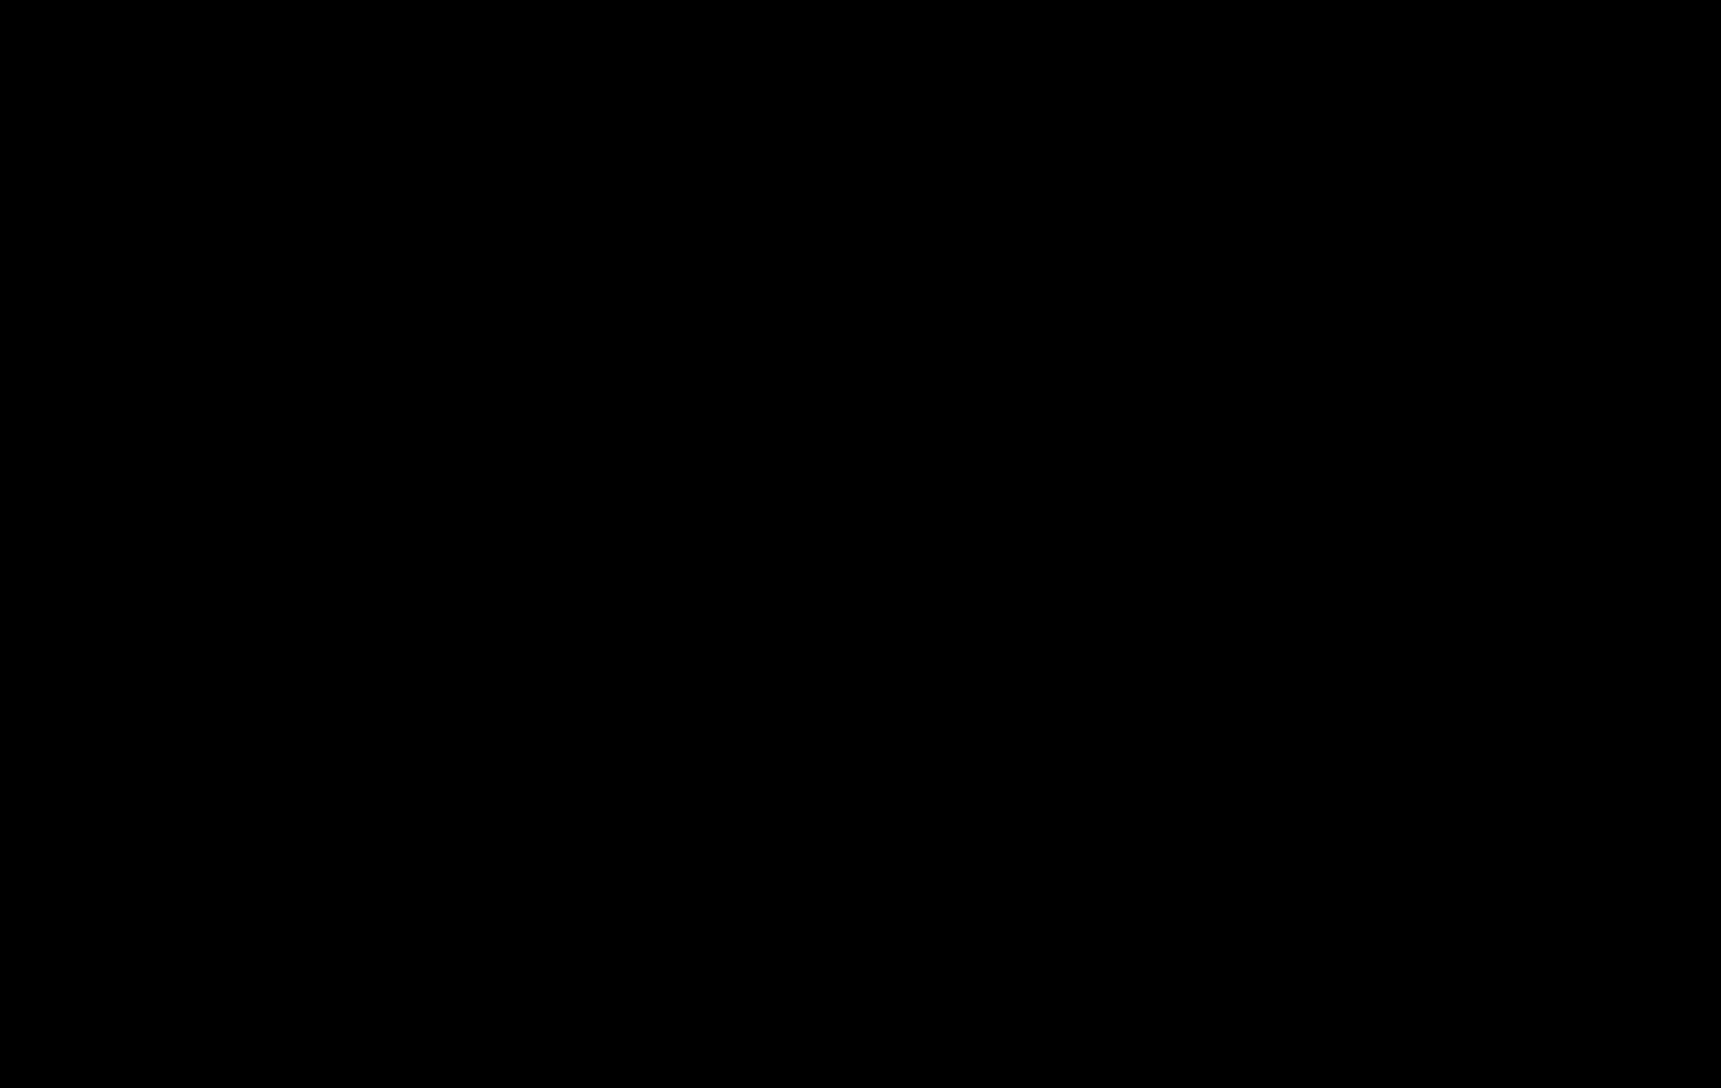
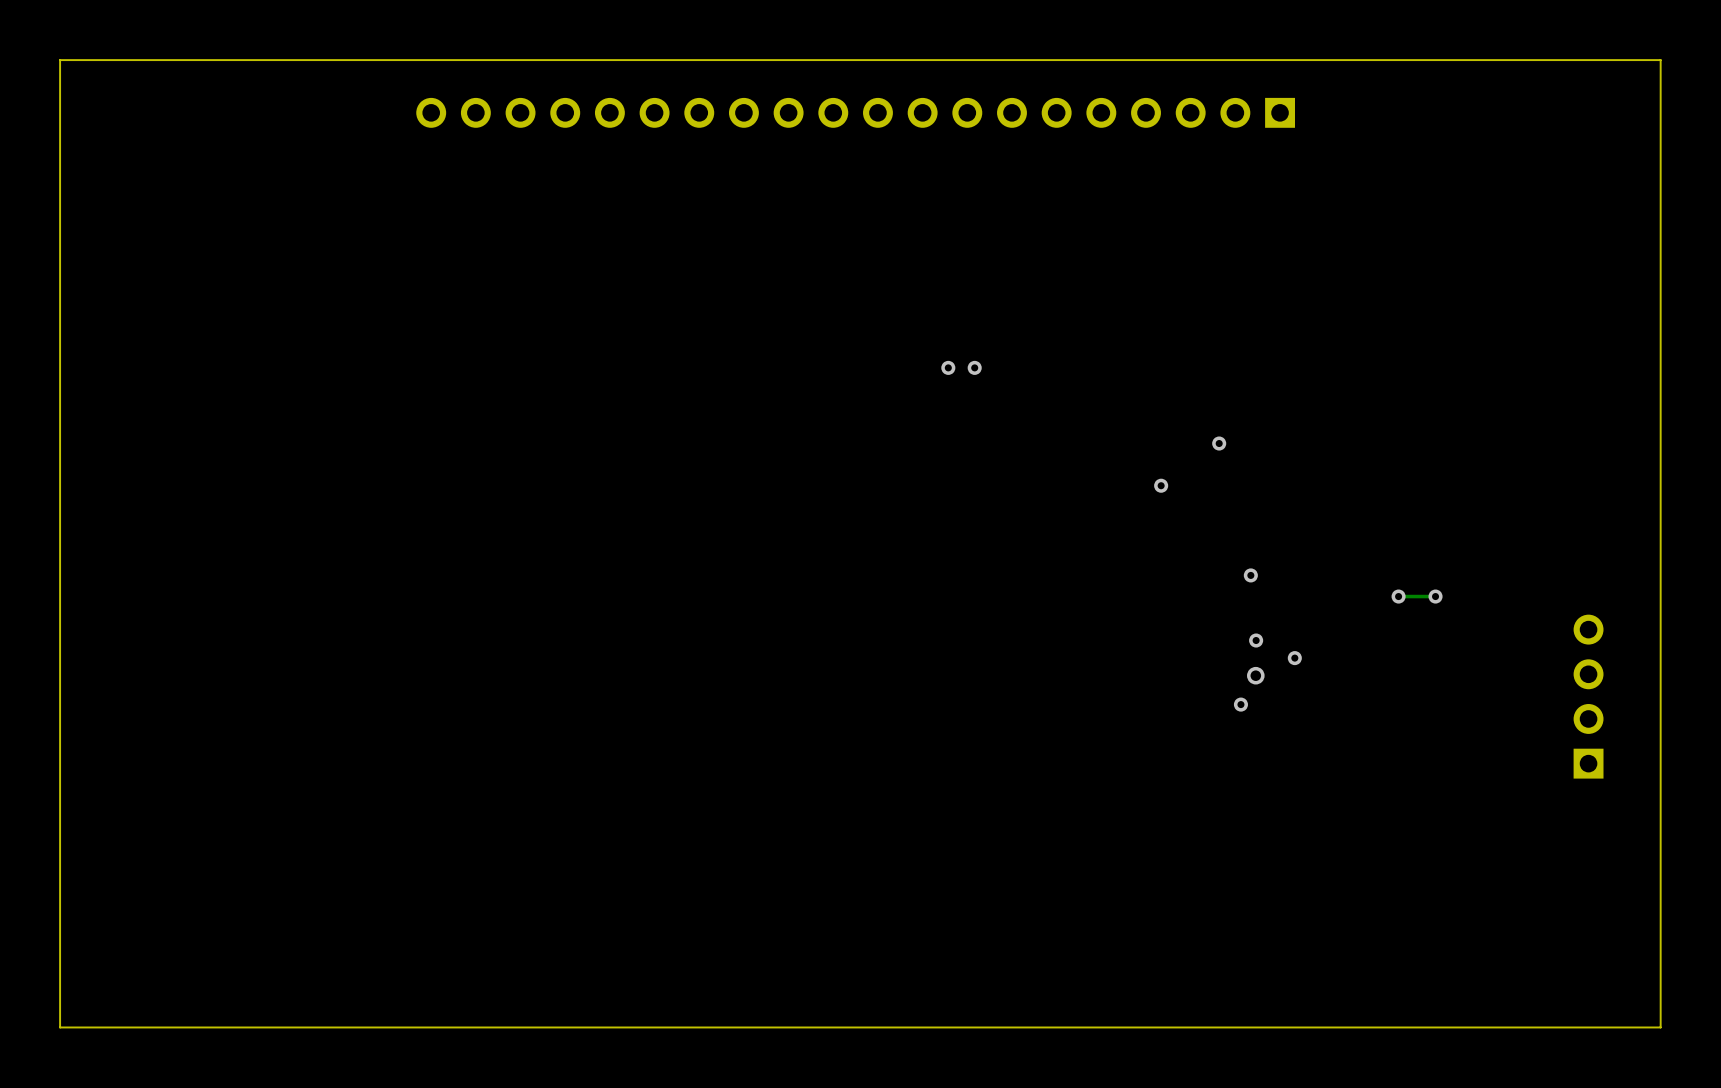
board edge: none -> (1660, 60) (60, 60) (60, 1027) (1660, 1027) (1660, 60)
part: none -> (855, 112)
via: none -> (948, 367)
via: none -> (974, 367)
via: none -> (1219, 443)
via: none -> (1161, 485)
via: none -> (1250, 575)
via: none -> (1398, 596)
track: none -> (1435, 596) (1398, 596)
via: none -> (1435, 596)
via: none -> (1256, 640)
via: none -> (1294, 658)
via: none -> (1255, 675)
part: none -> (1588, 696)
via: none -> (1240, 704)

